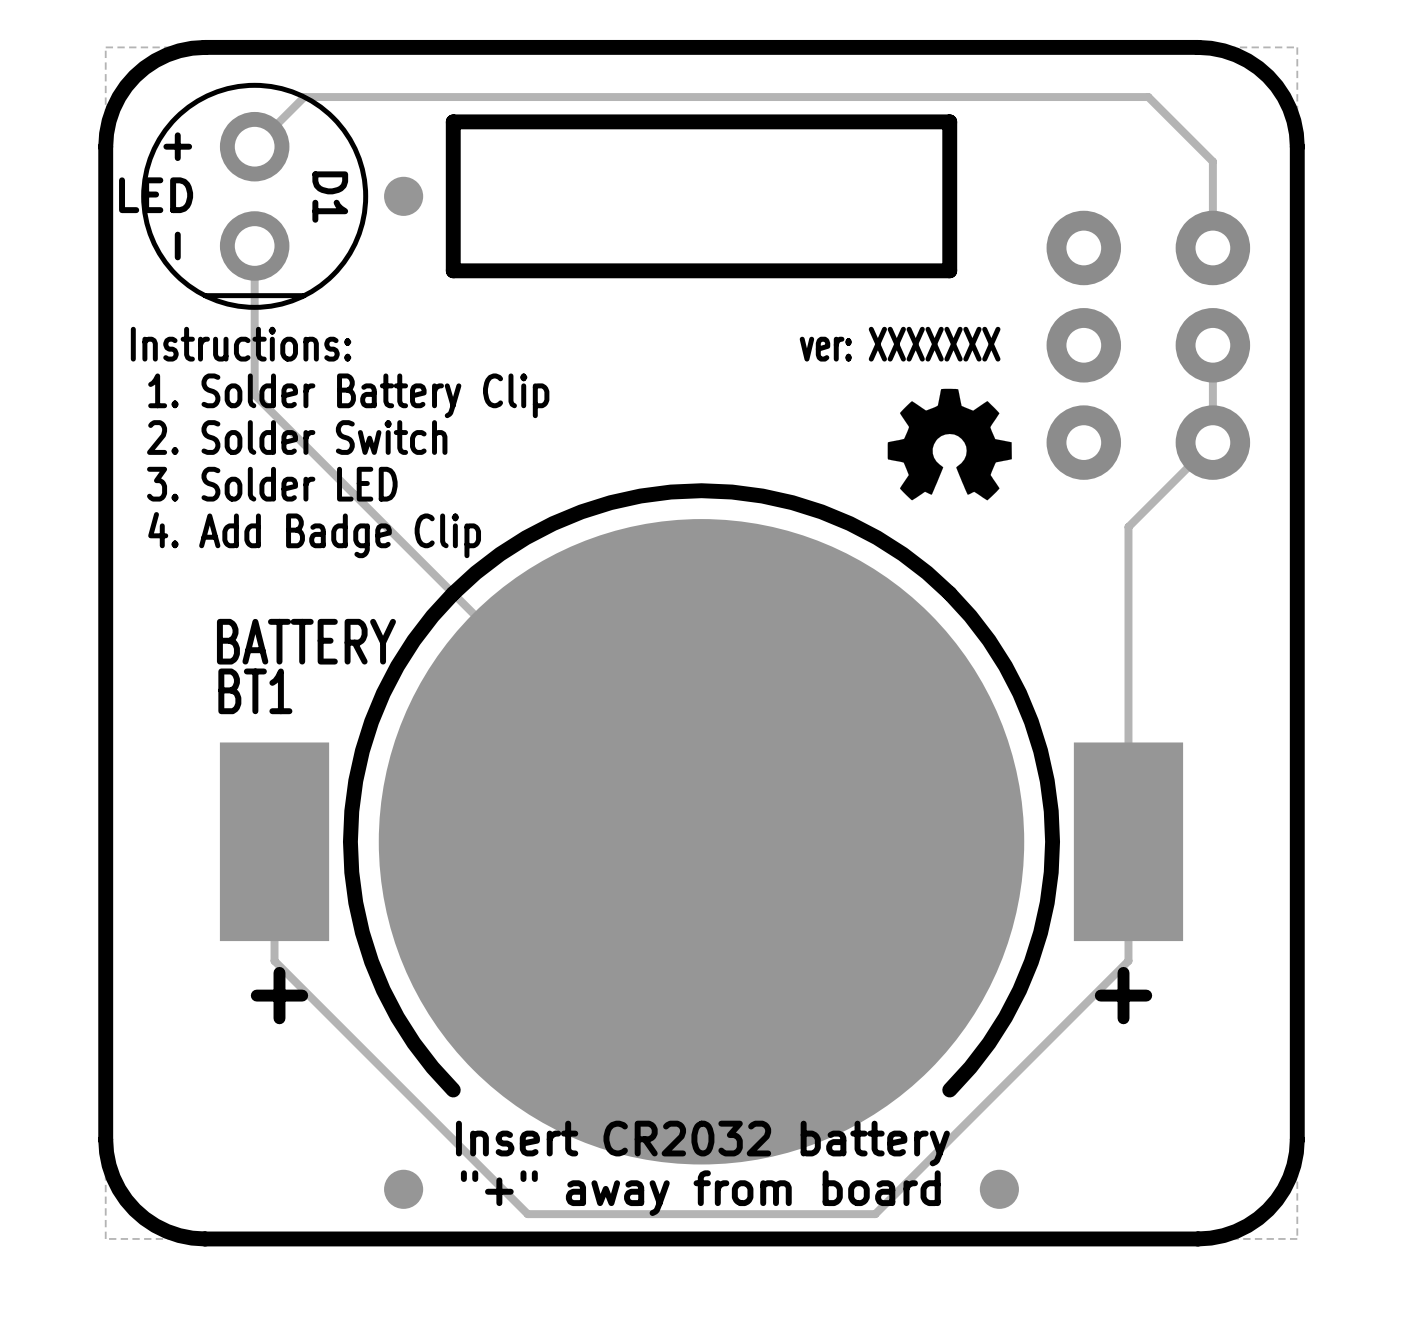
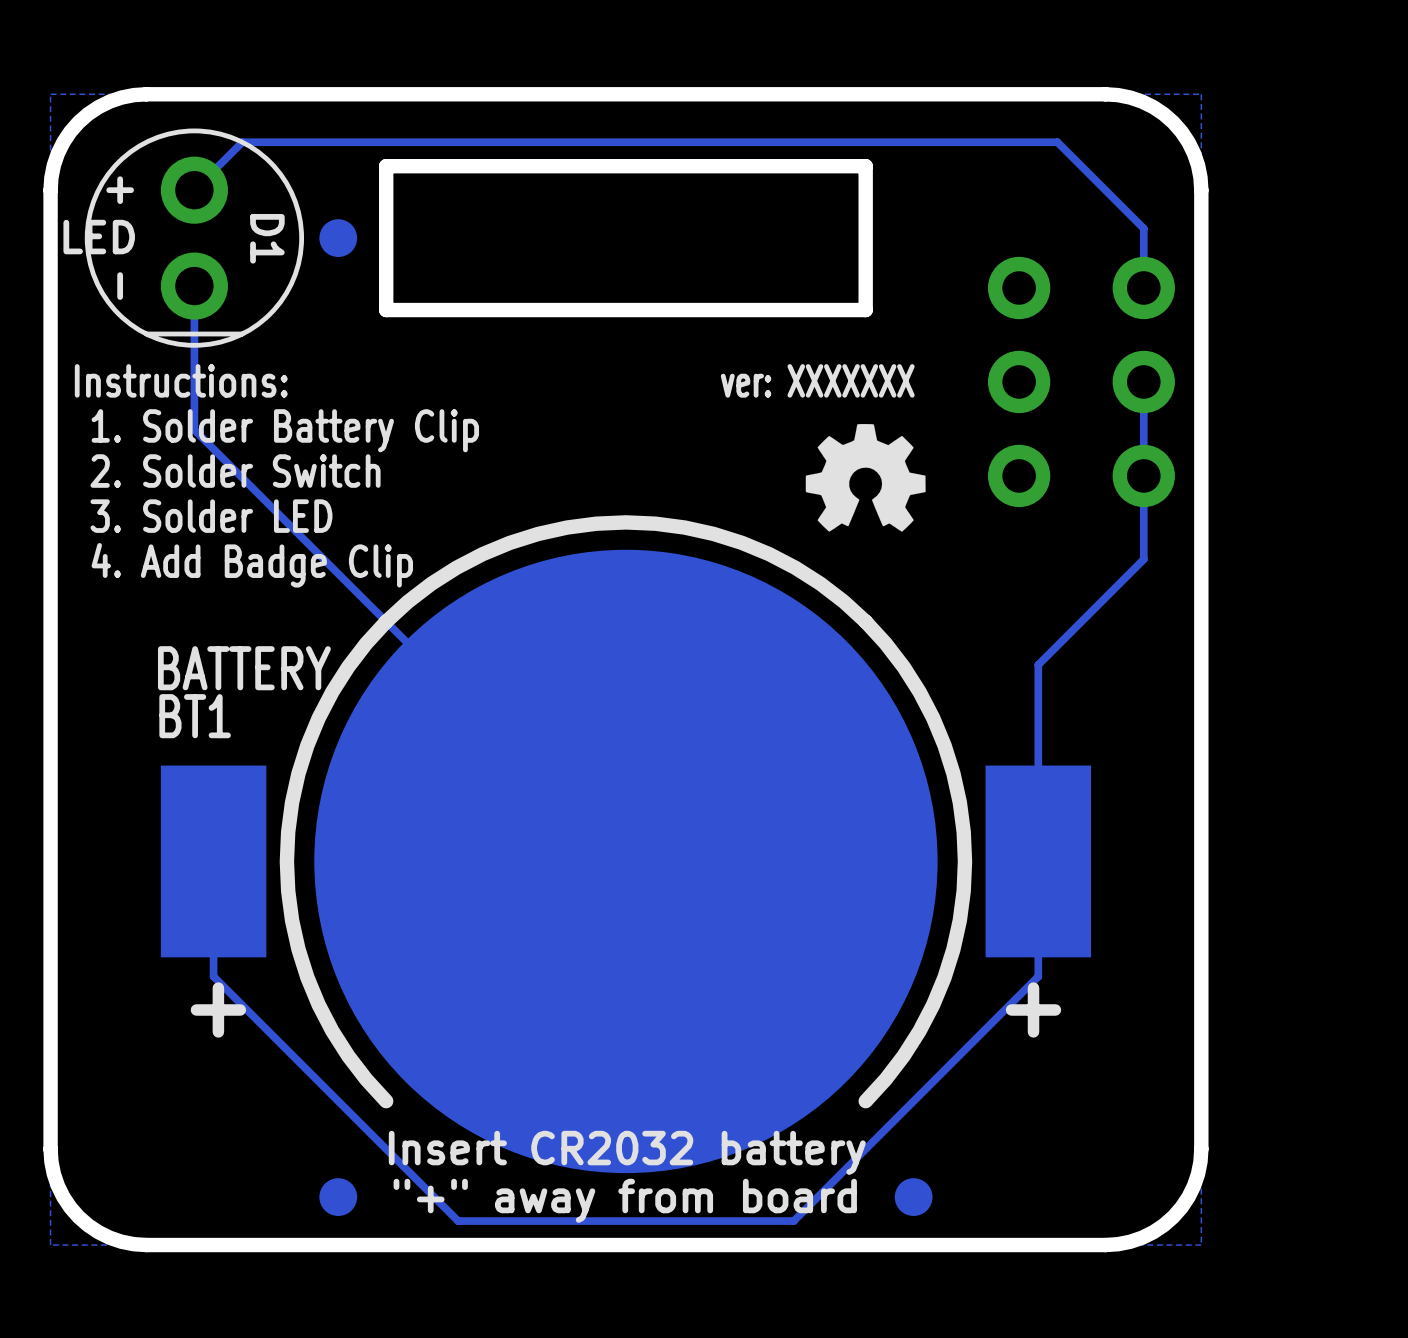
track: (1212, 161) (1212, 247) -> (1119, 204) (1143, 228) (1143, 287)
part footprint: [1046, 210, 1251, 480] -> [987, 256, 1175, 508]
track: (1212, 345) (1212, 442) (1128, 527) (1128, 638) -> (1143, 381) (1143, 559) (1038, 664)

